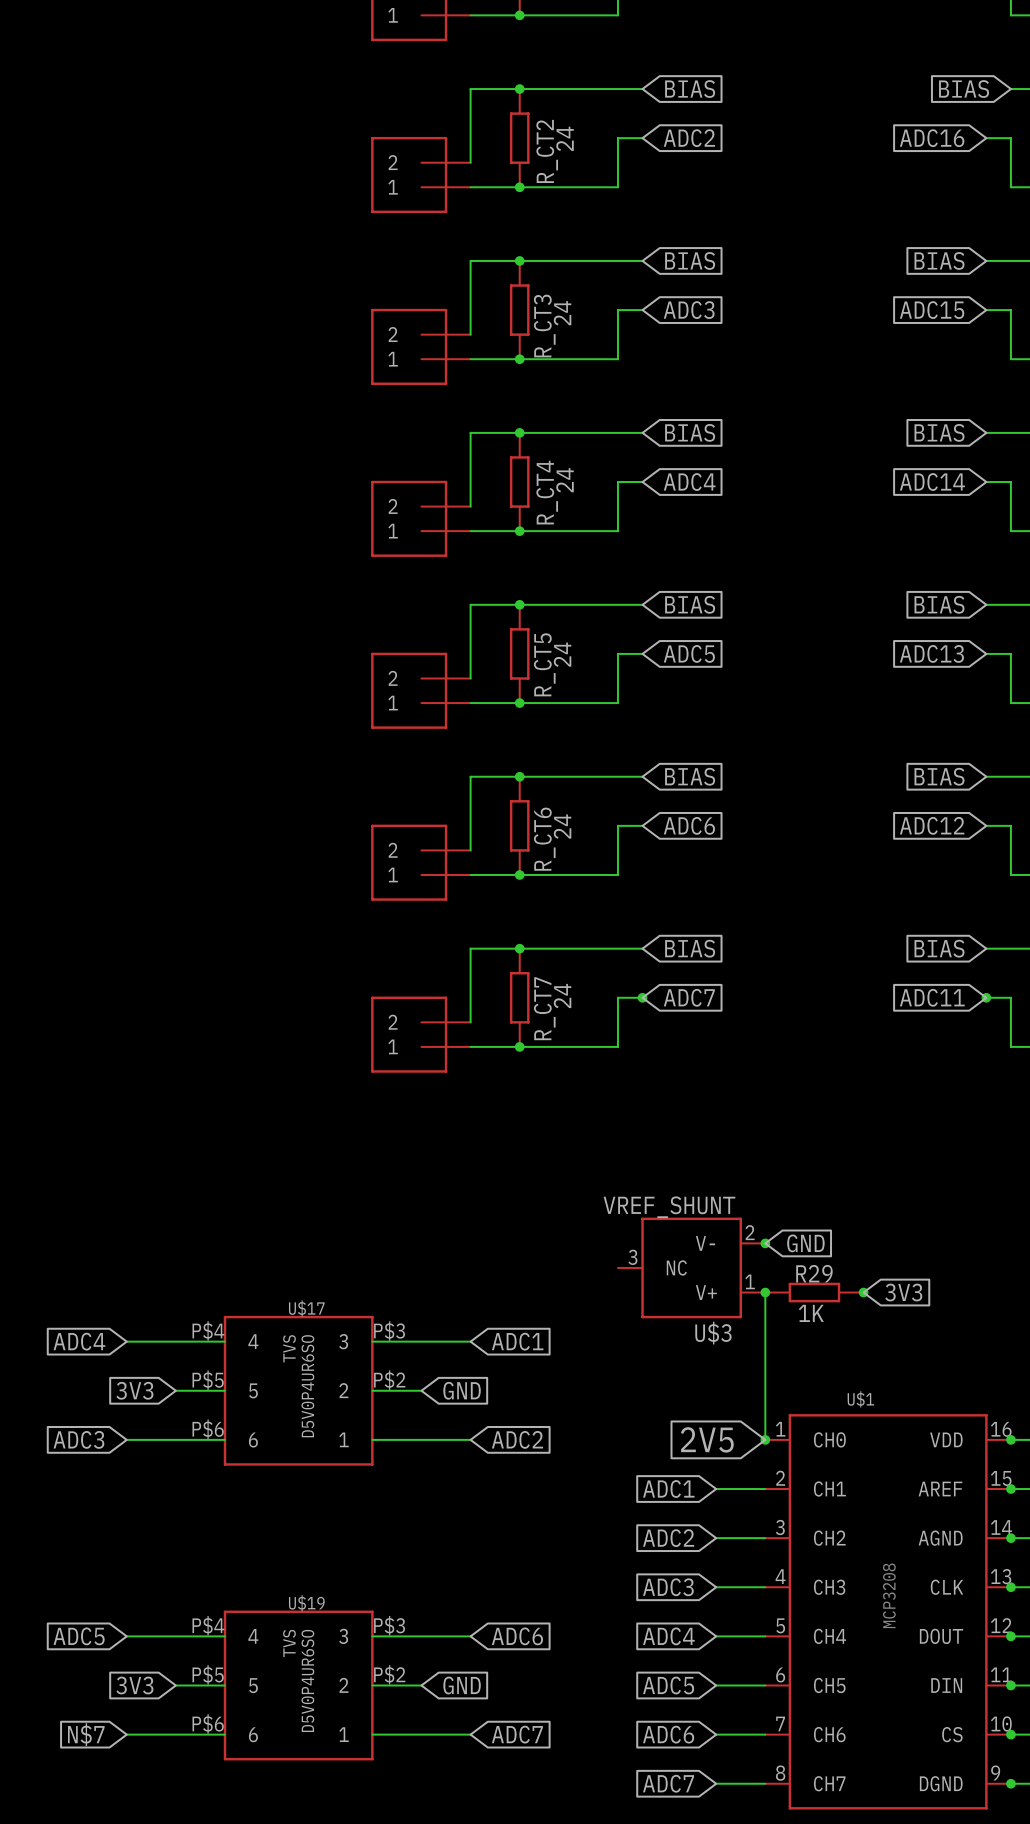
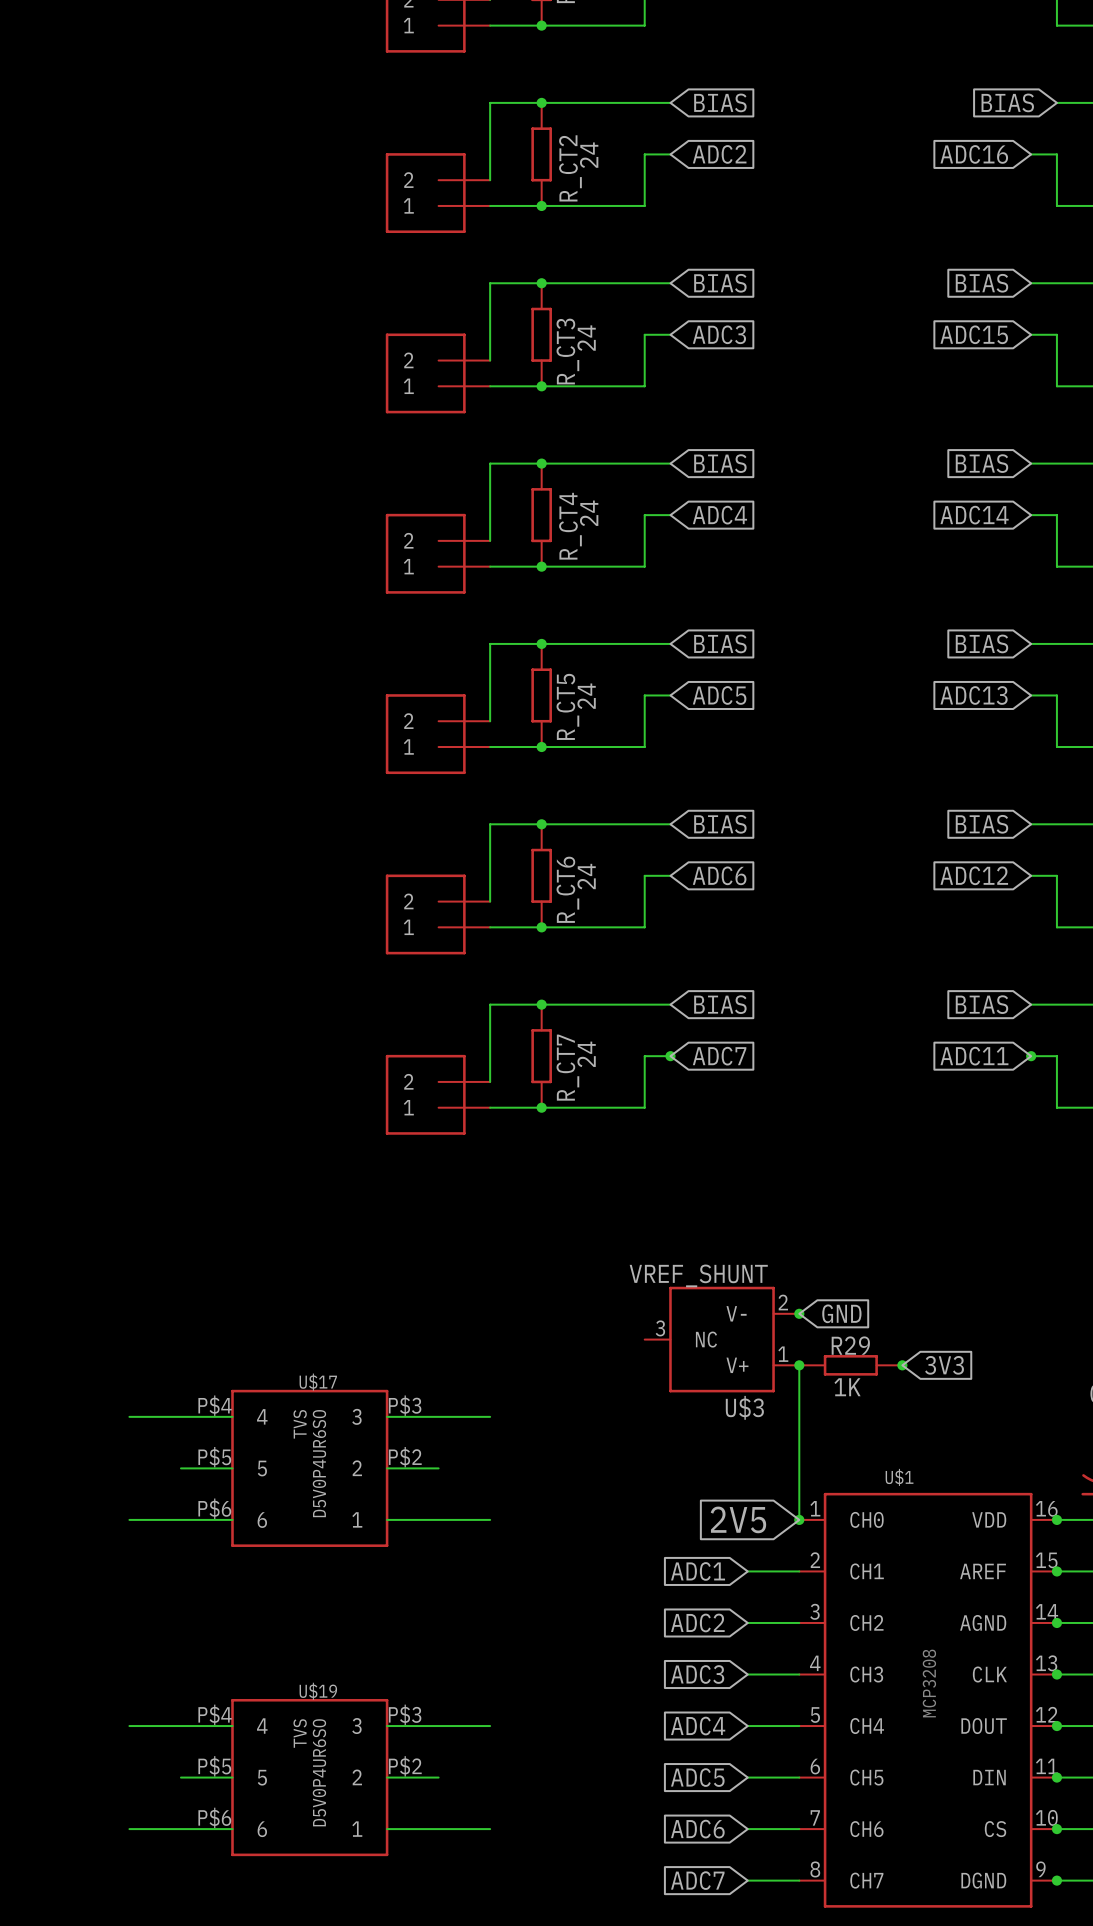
global label: ADC4 (79, 1341) -> none
global label: ADC1 (517, 1341) -> none
global label: 3V3 (134, 1390) -> none
global label: GND (462, 1390) -> none
global label: ADC3 (78, 1439) -> none
global label: ADC2 (517, 1439) -> none
global label: ADC5 (79, 1636) -> none
global label: ADC6 (517, 1636) -> none
global label: 3V3 (134, 1685) -> none
global label: GND (462, 1685) -> none
global label: N$7 (86, 1734) -> none
global label: ADC7 (517, 1734) -> none

